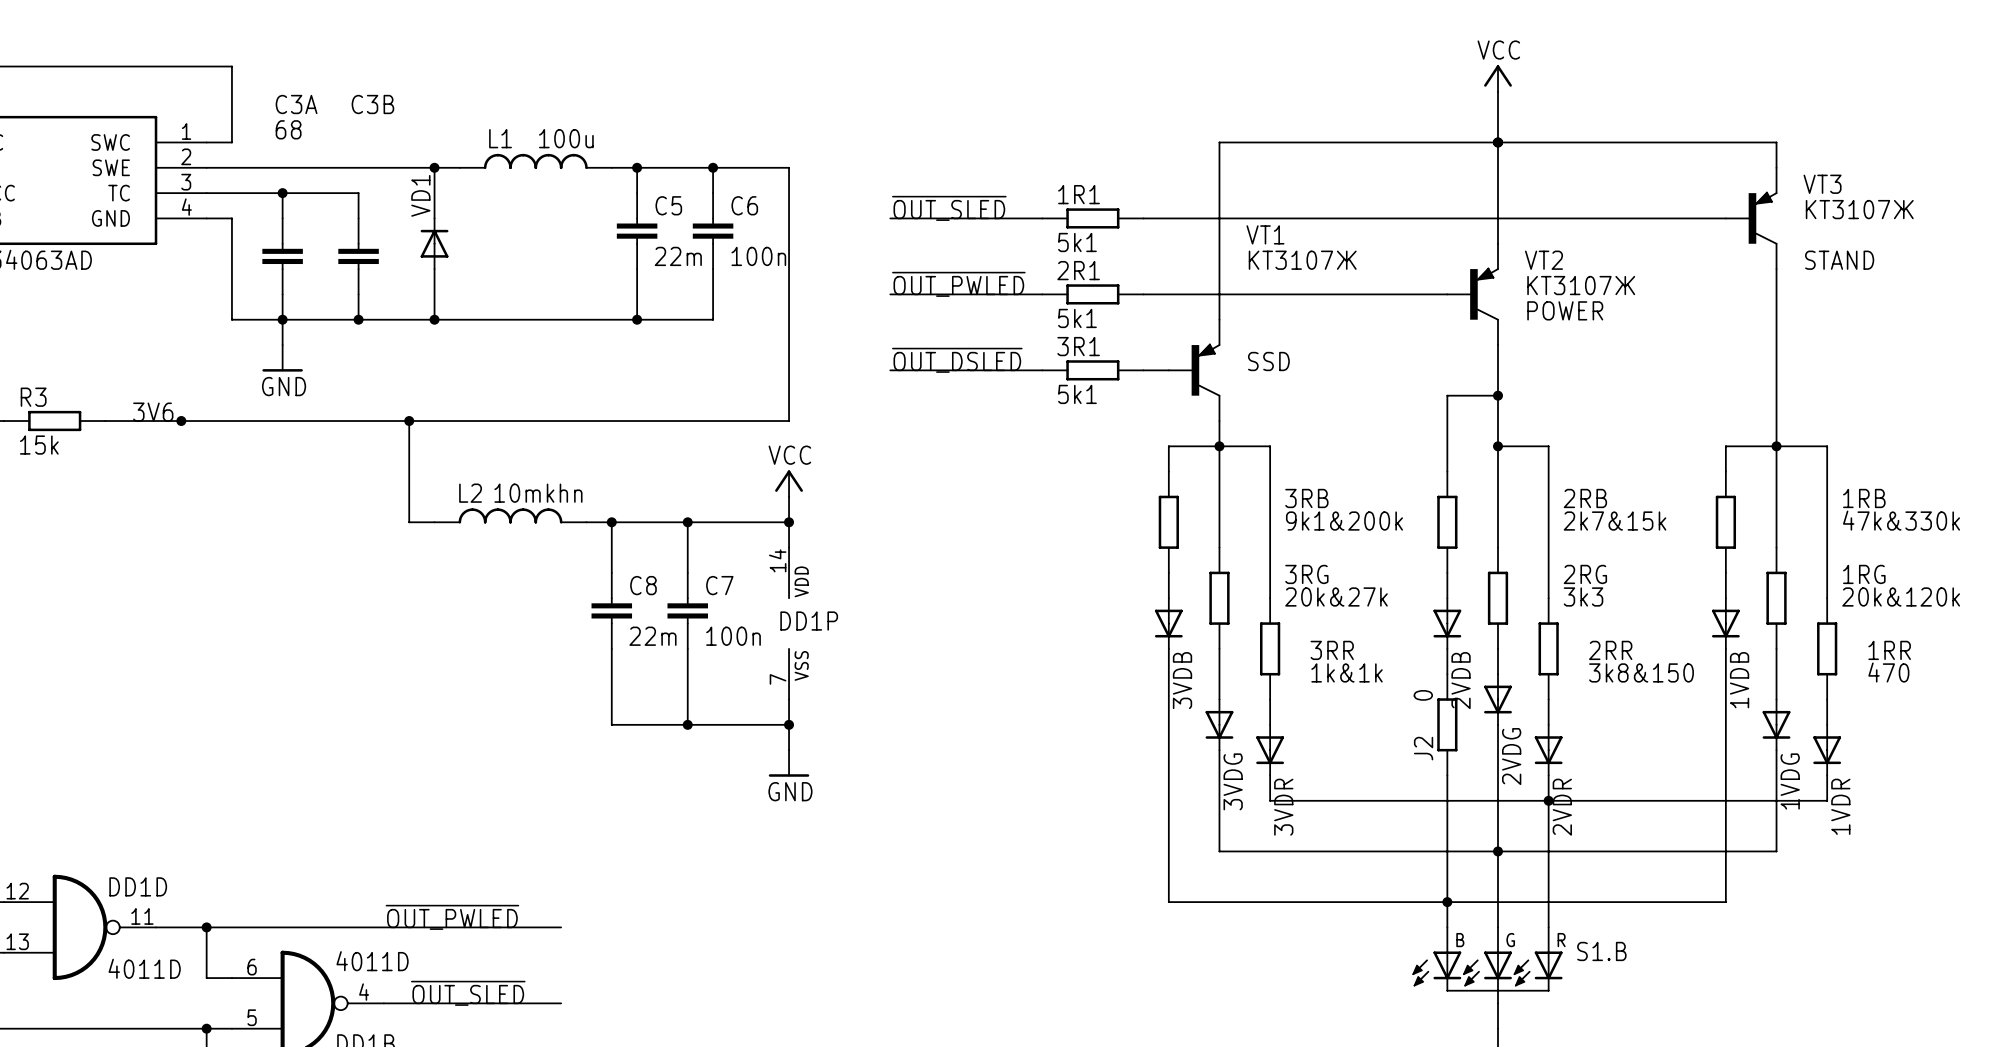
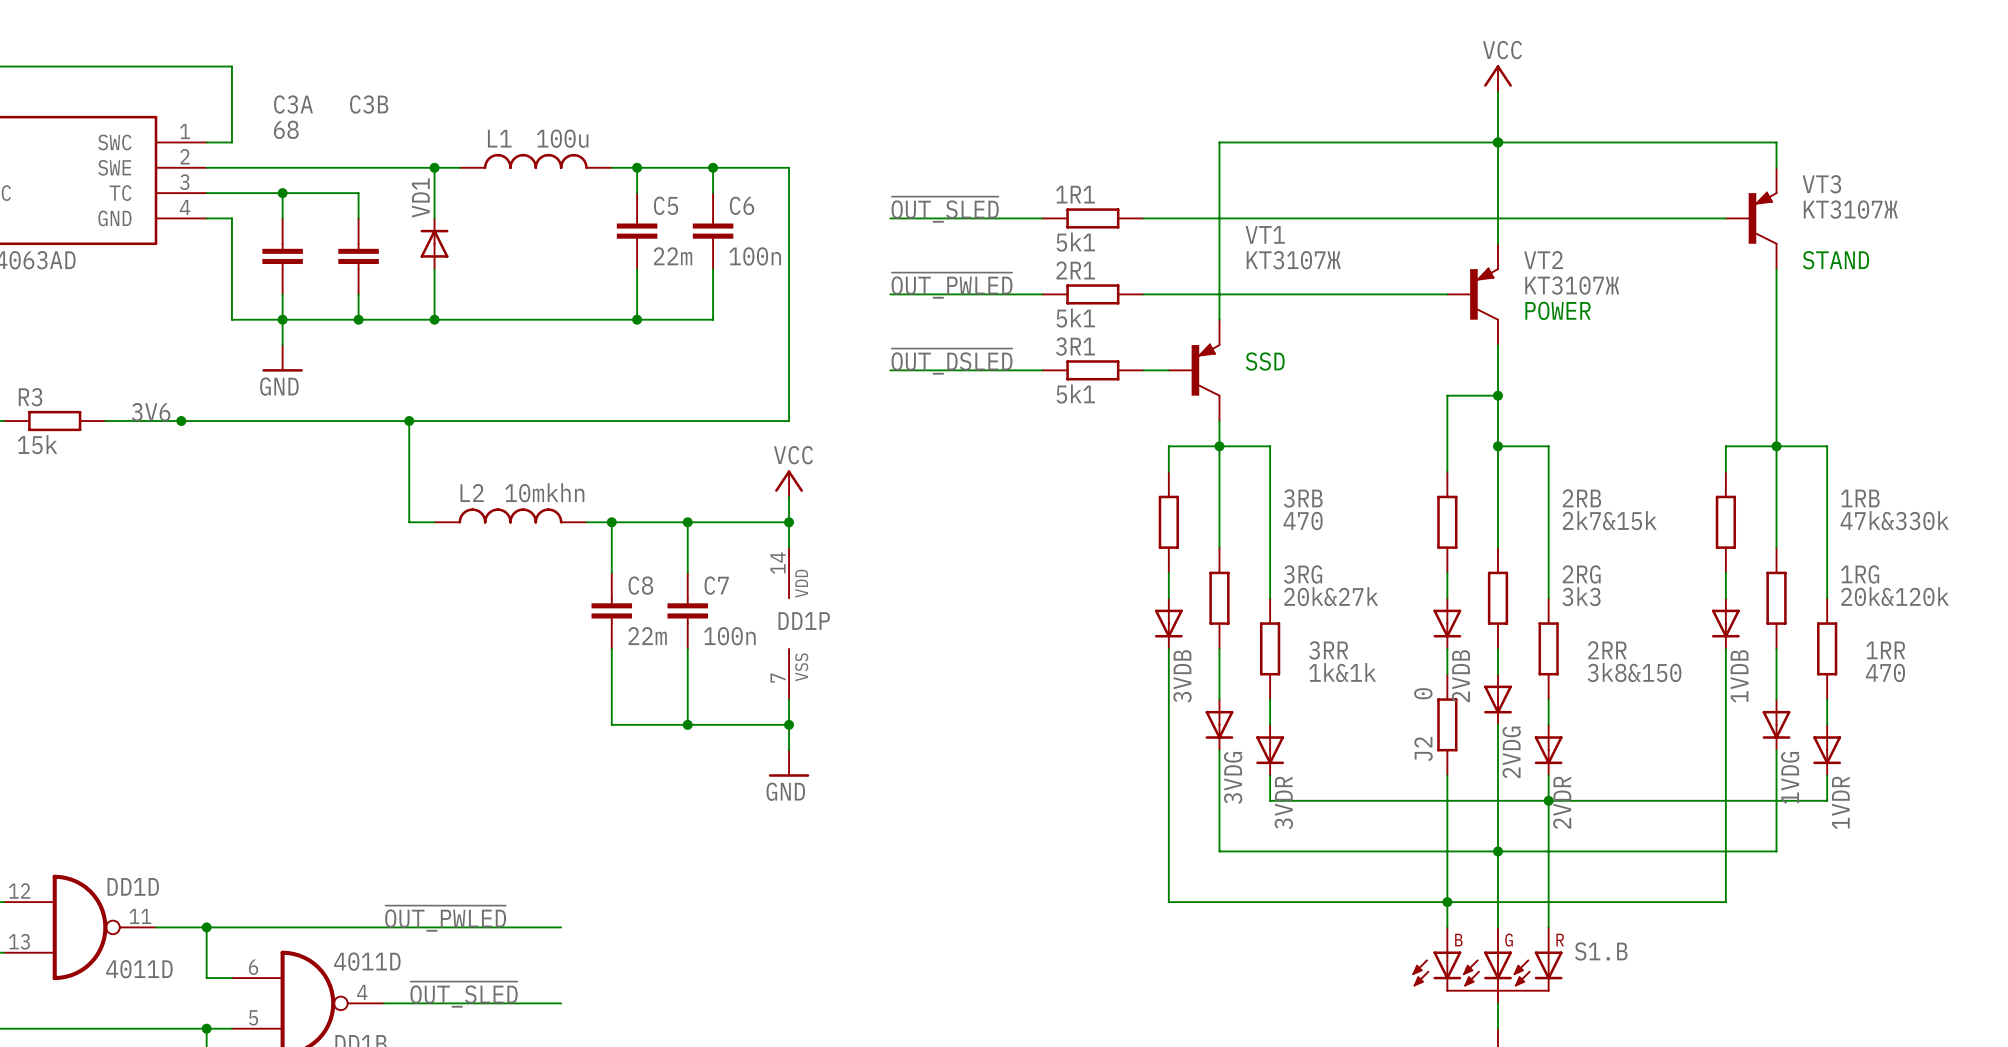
3RB value: 9k1&200k (1344, 521) -> 470 (1303, 521)

